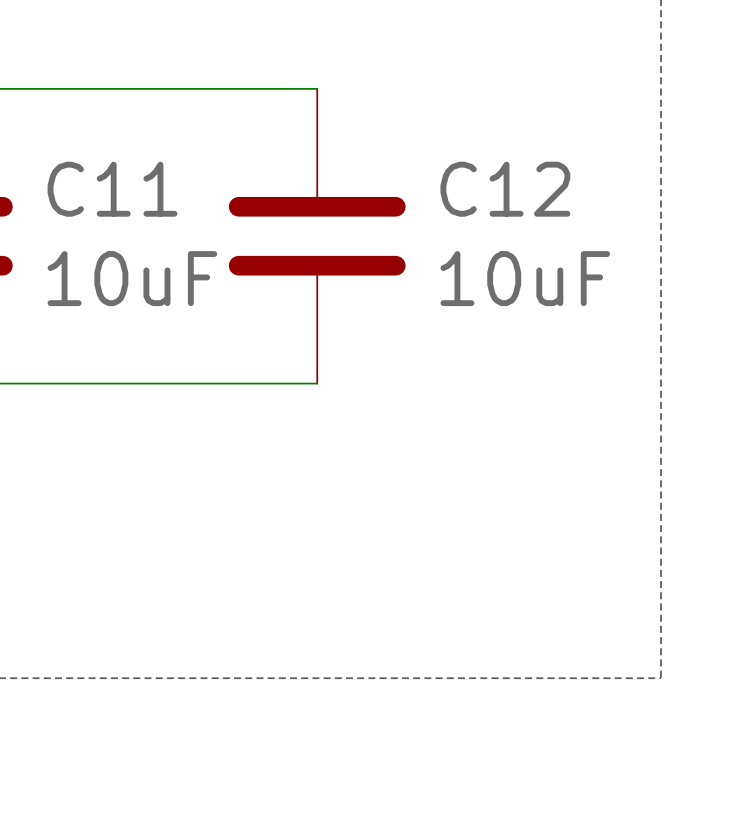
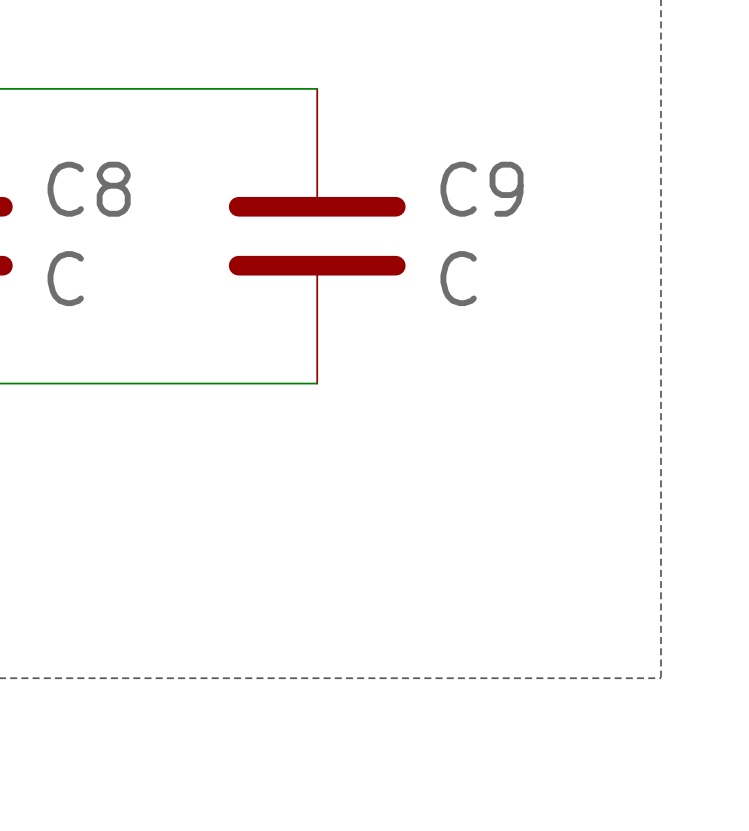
C11 name: C11 (112, 189) -> C8 (89, 189)
C12 name: C12 (505, 189) -> C9 (481, 189)
C11 value: 10uF (132, 278) -> C (65, 278)
C12 value: 10uF (525, 278) -> C (458, 278)

